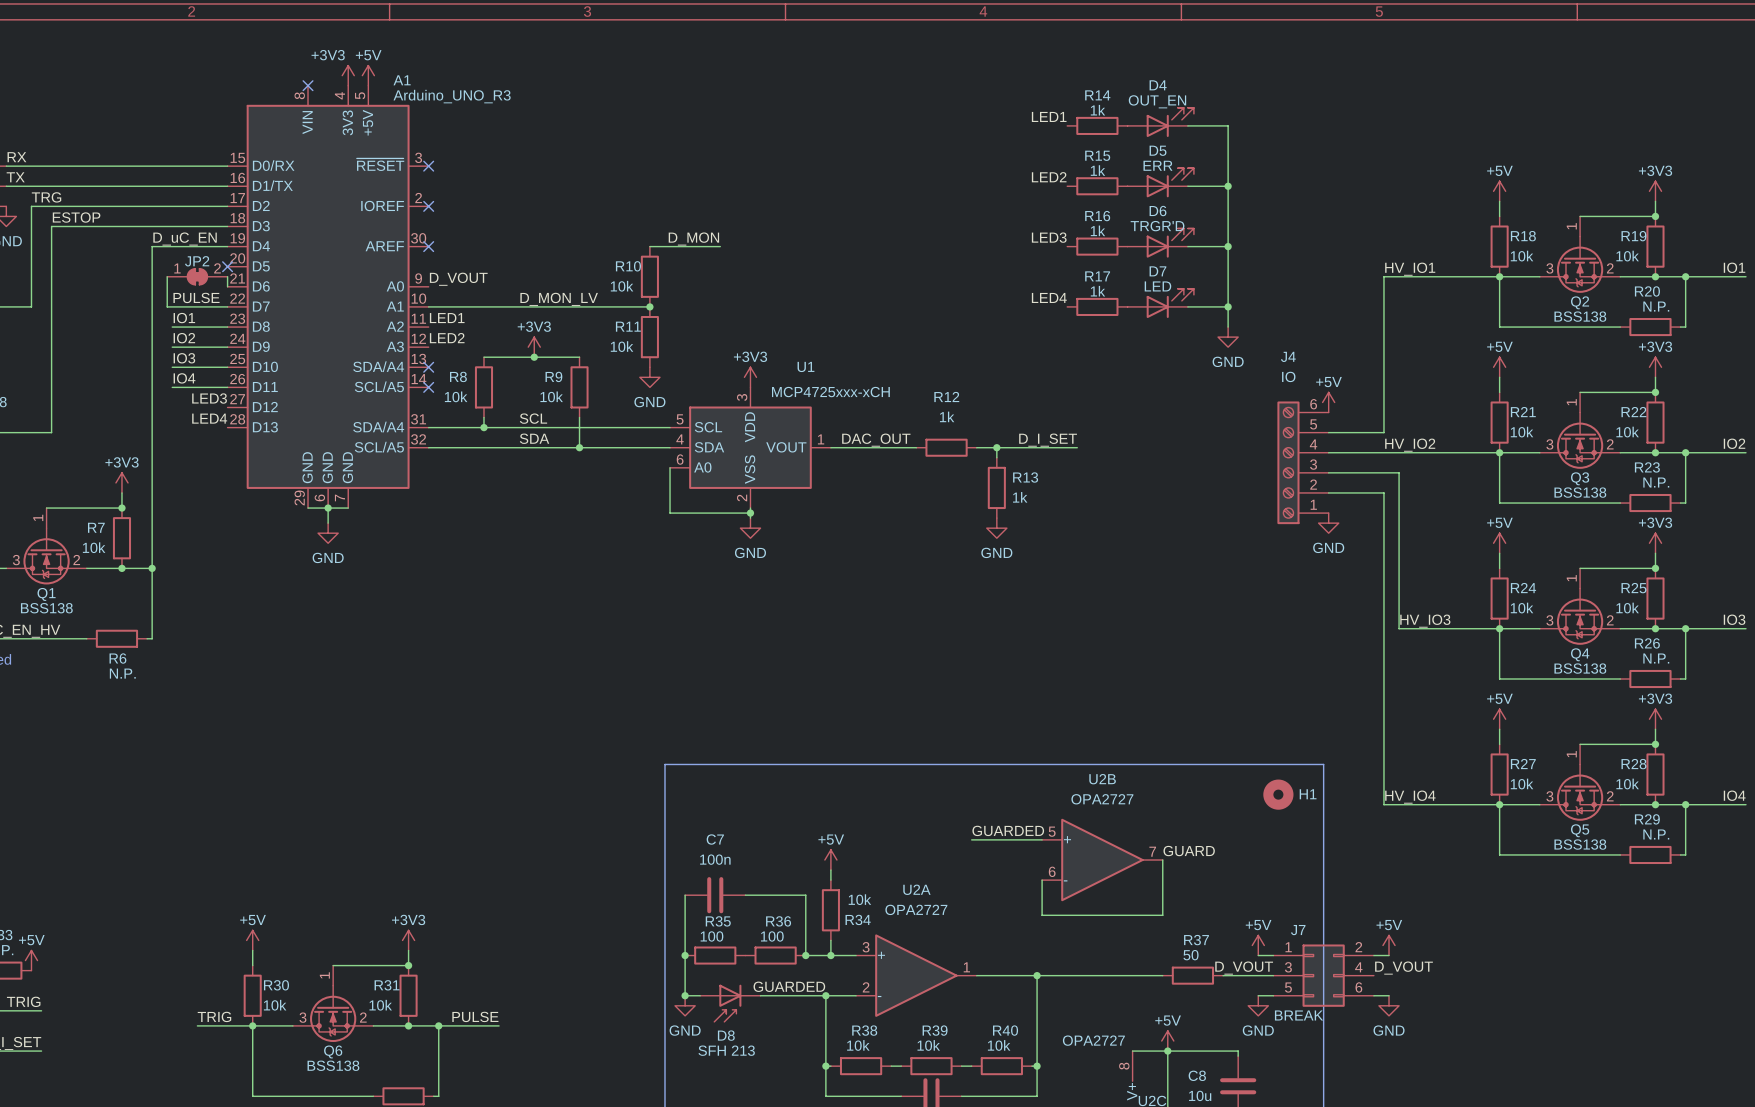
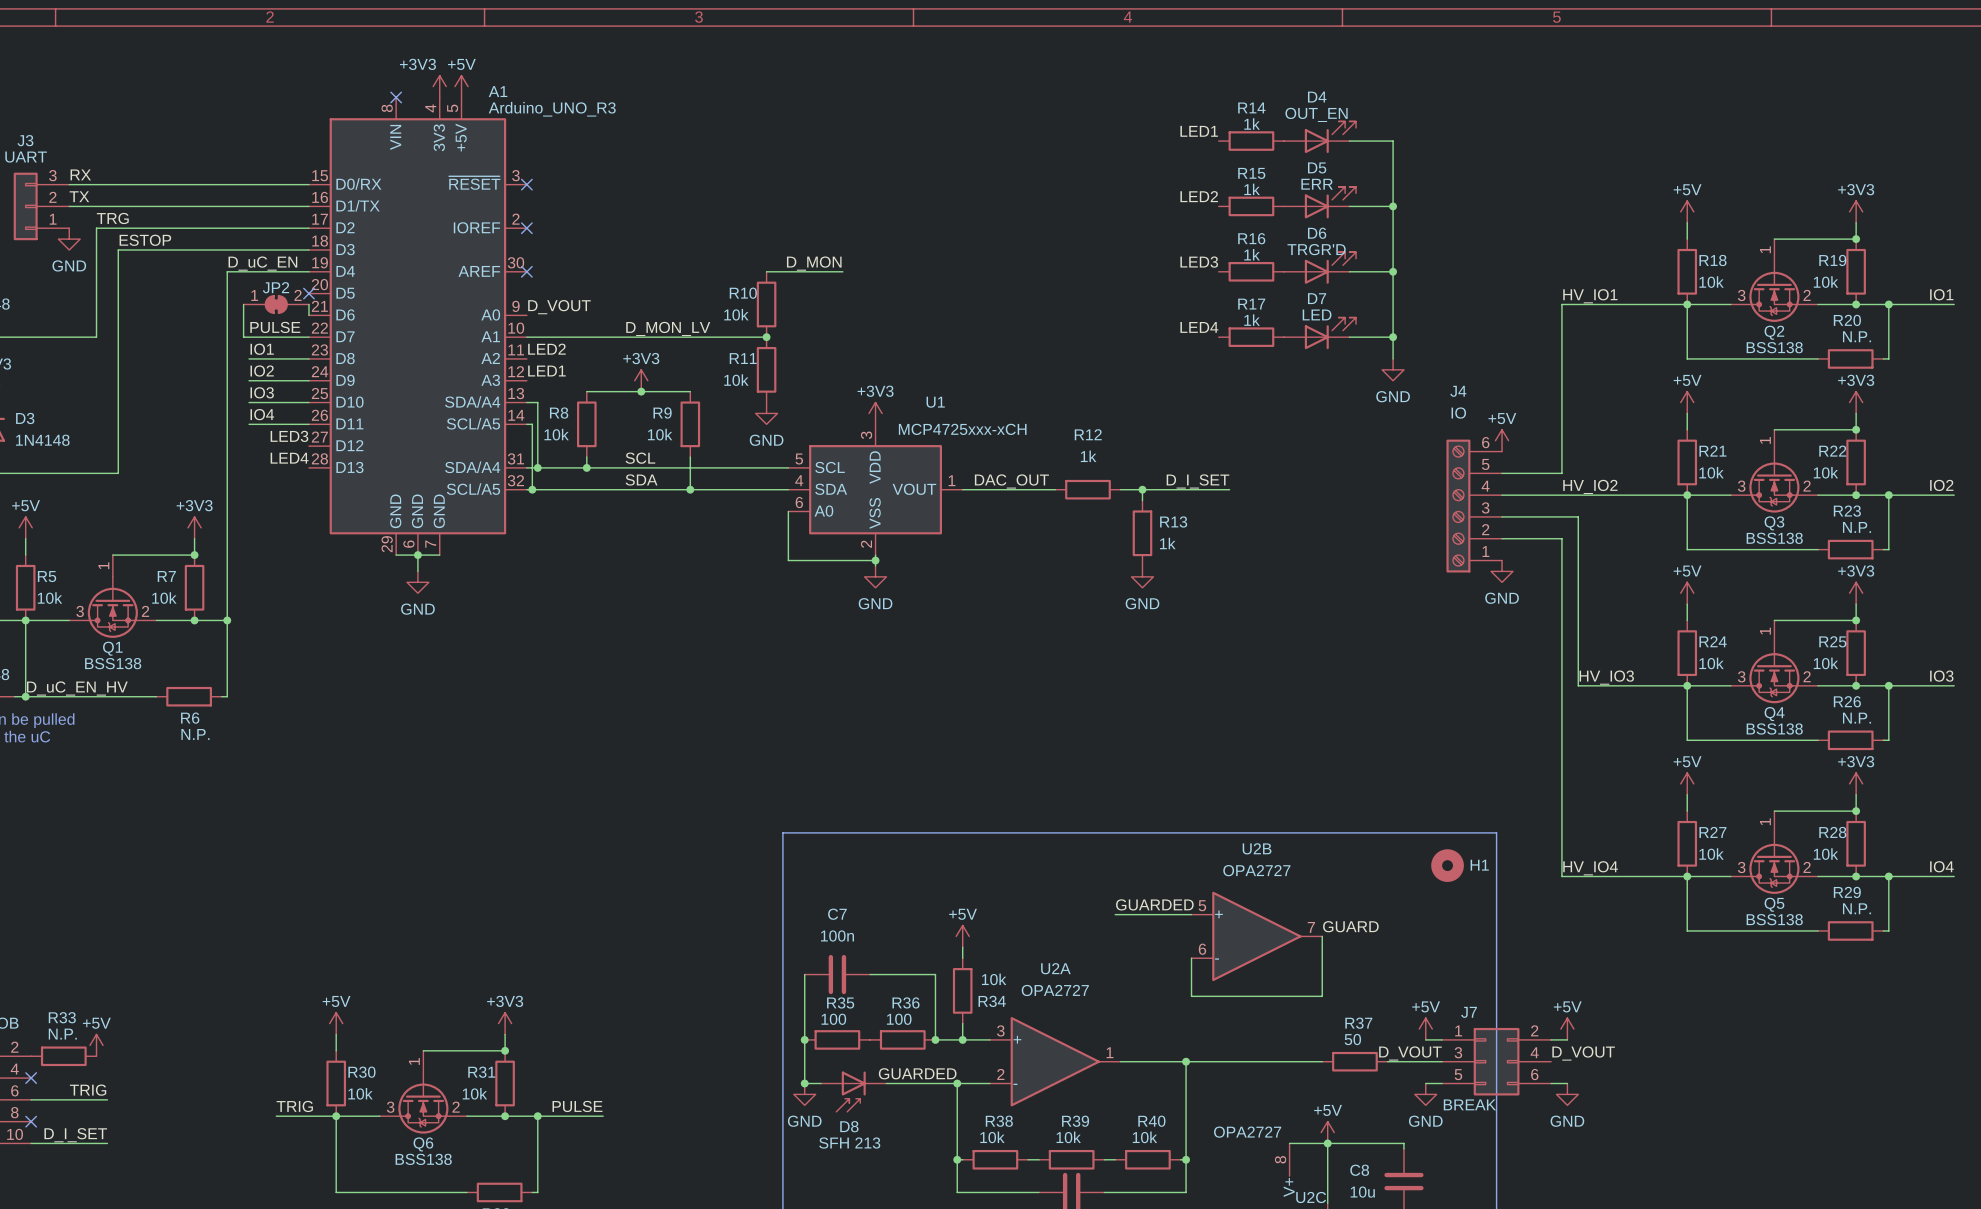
label: LED1 (447, 318) -> LED2 (546, 349)
label: LED2 (447, 338) -> LED1 (546, 371)
wire: none -> (526, 402) (537, 402) (537, 467)
no-connect mark: (428, 367) -> none
wire: none -> (526, 424) (532, 424) (532, 489)
no-connect mark: (428, 387) -> none
junction: none -> (537, 467)
junction: none -> (532, 489)

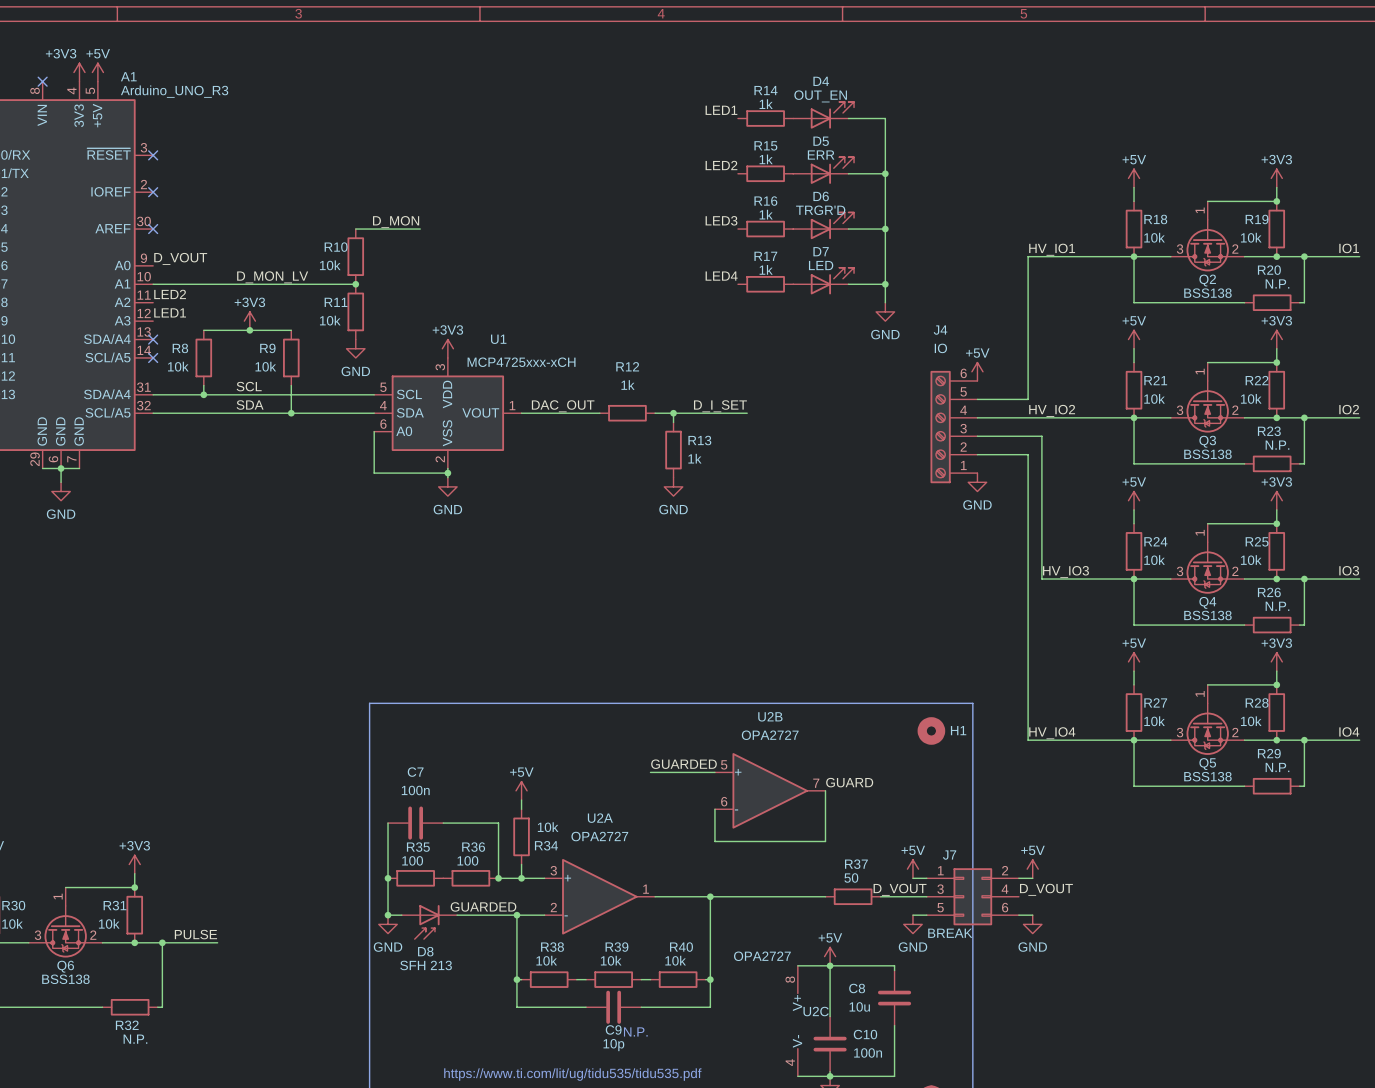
wire: (526, 402) (537, 402) (537, 467) -> none
no-connect mark: none -> (153, 339)
wire: (526, 424) (532, 424) (532, 489) -> none
no-connect mark: none -> (153, 357)
junction: (537, 467) -> none
junction: (532, 489) -> none

